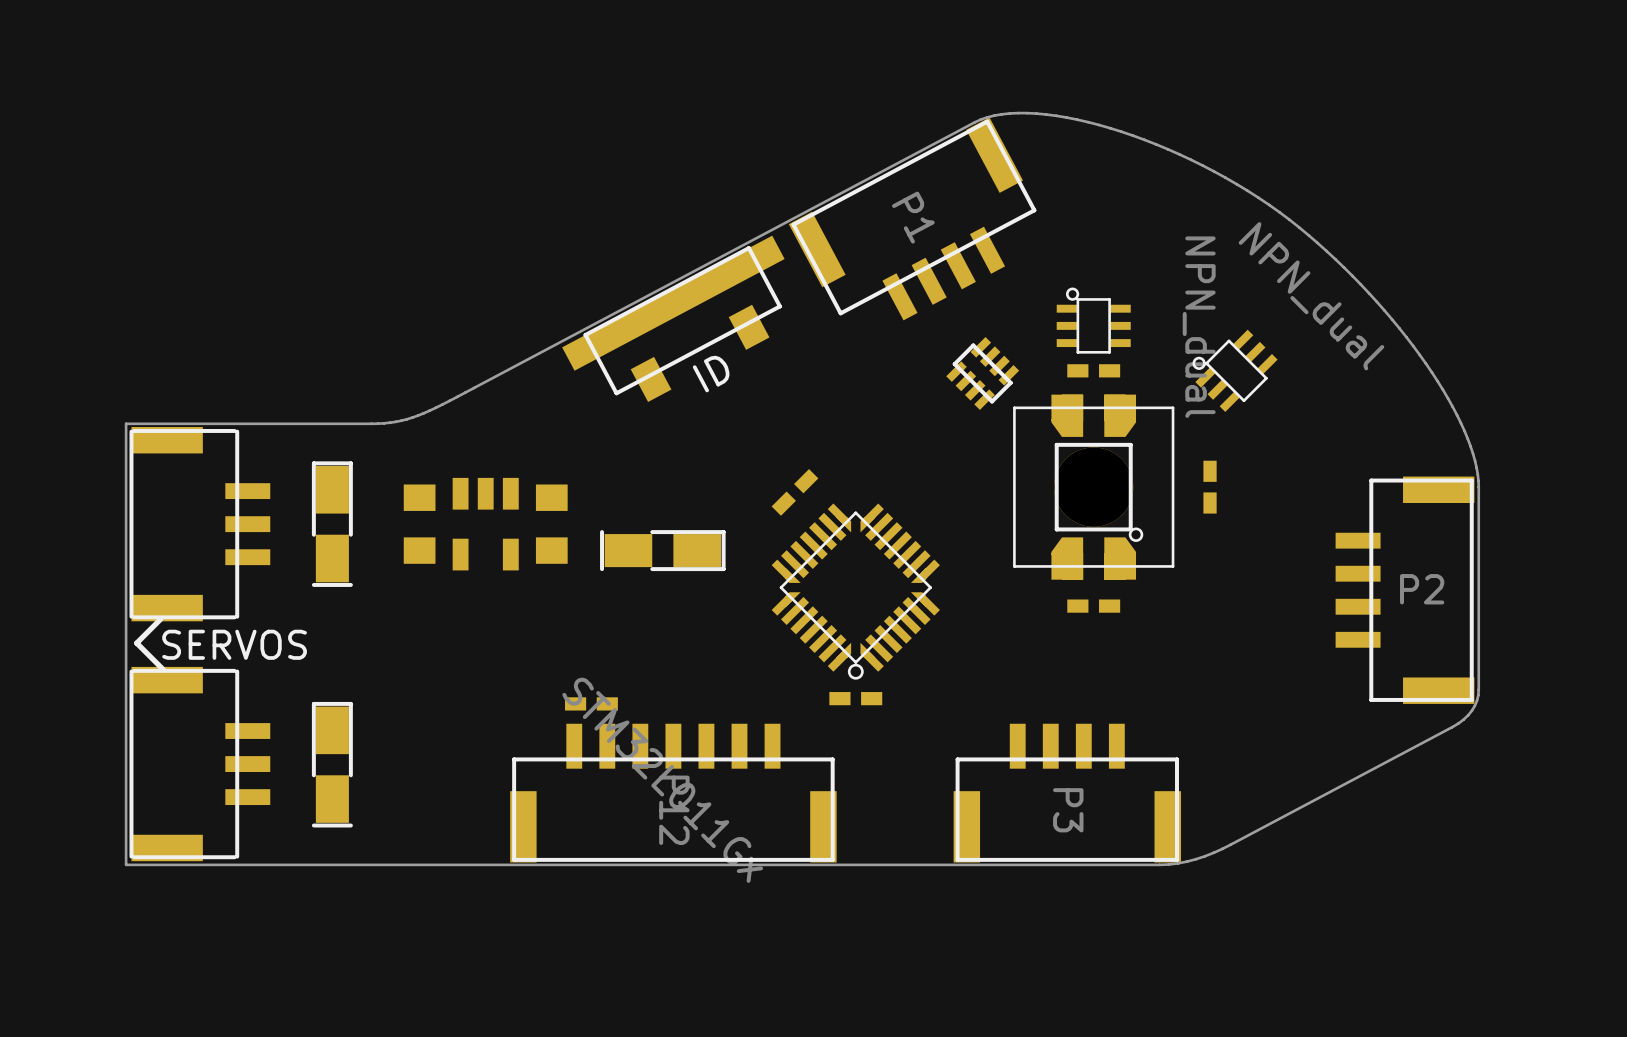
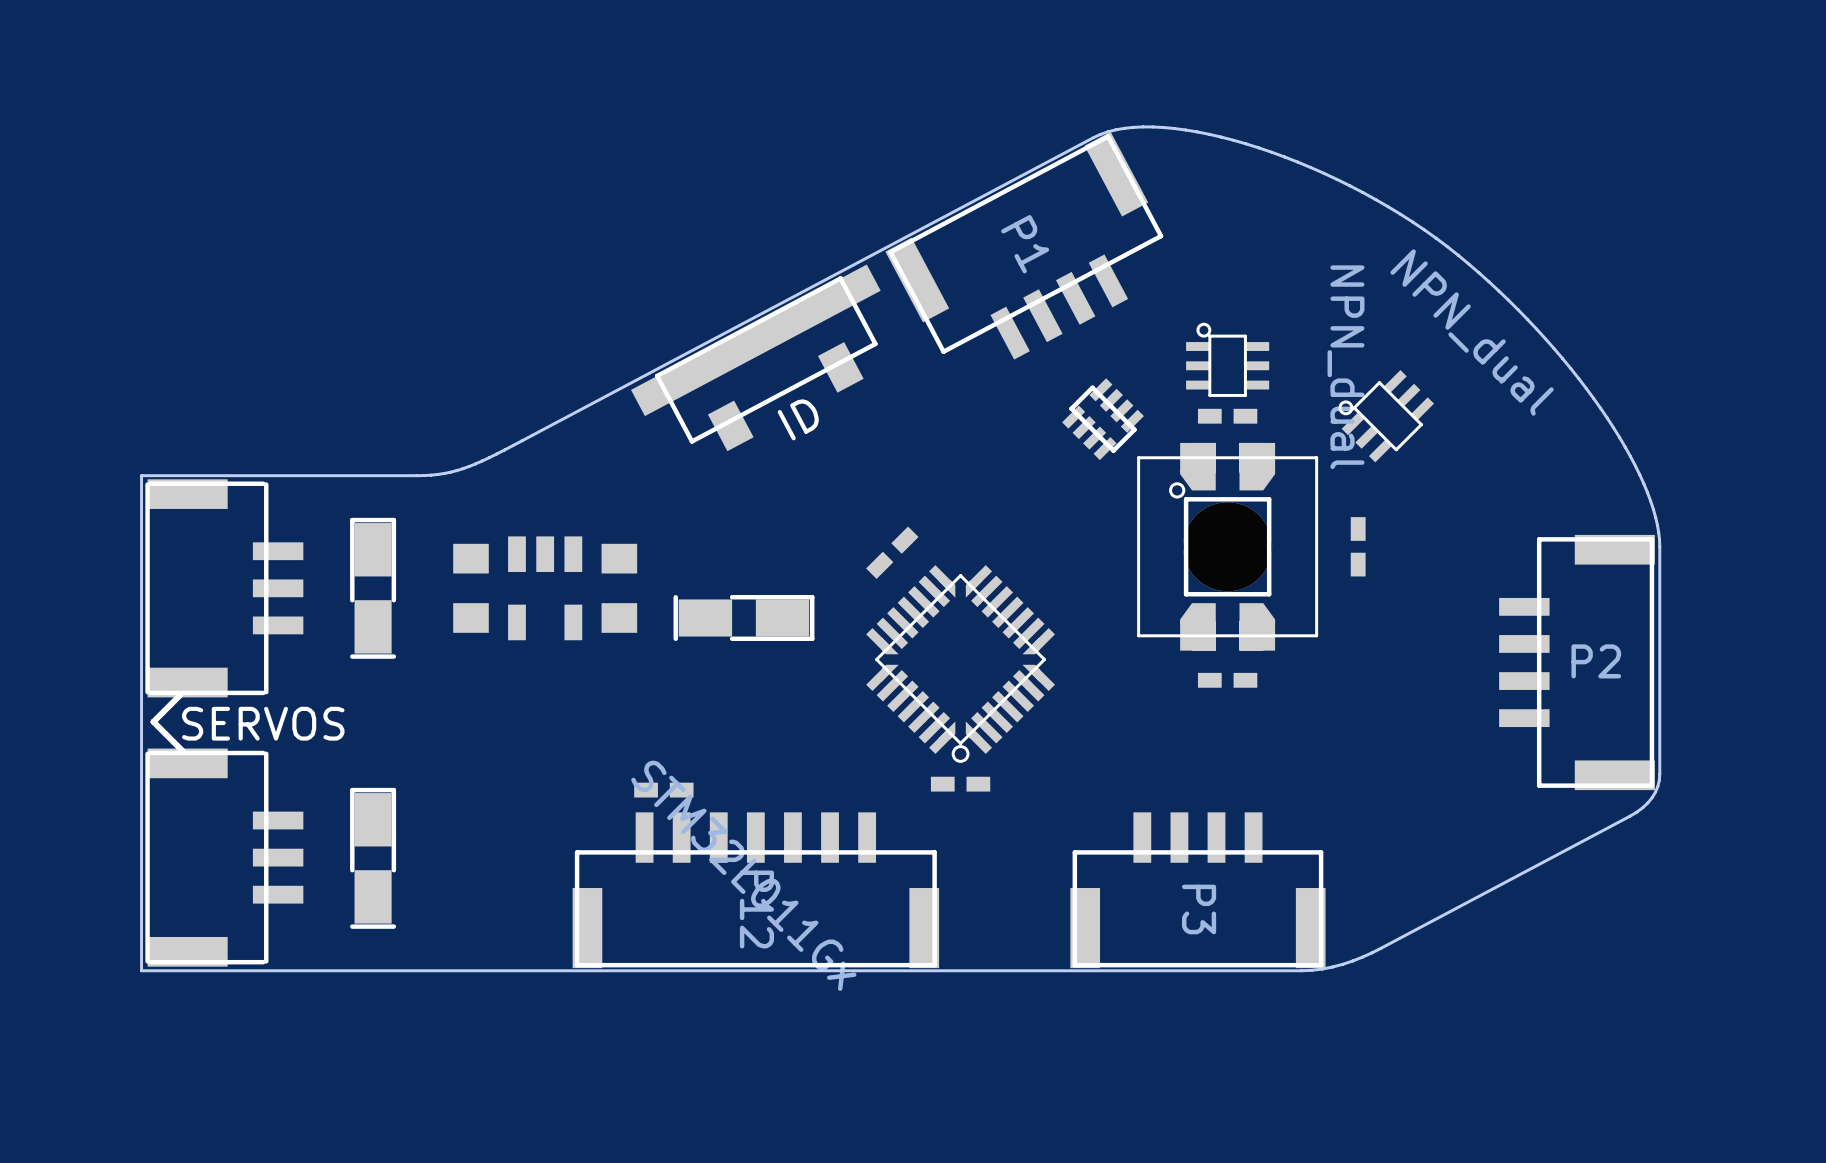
part footprint: [1013, 394, 1175, 580] -> [1137, 442, 1319, 651]

